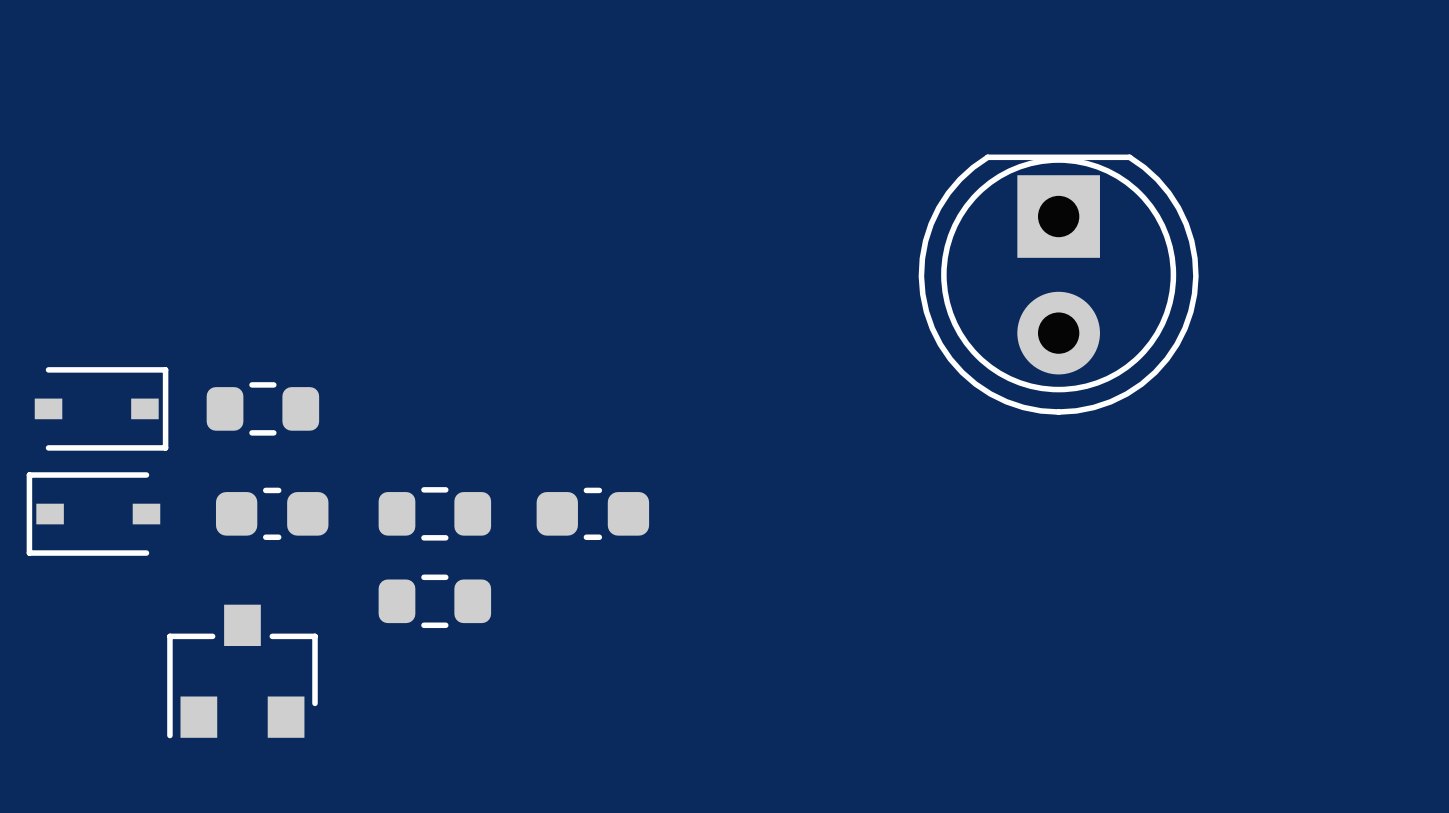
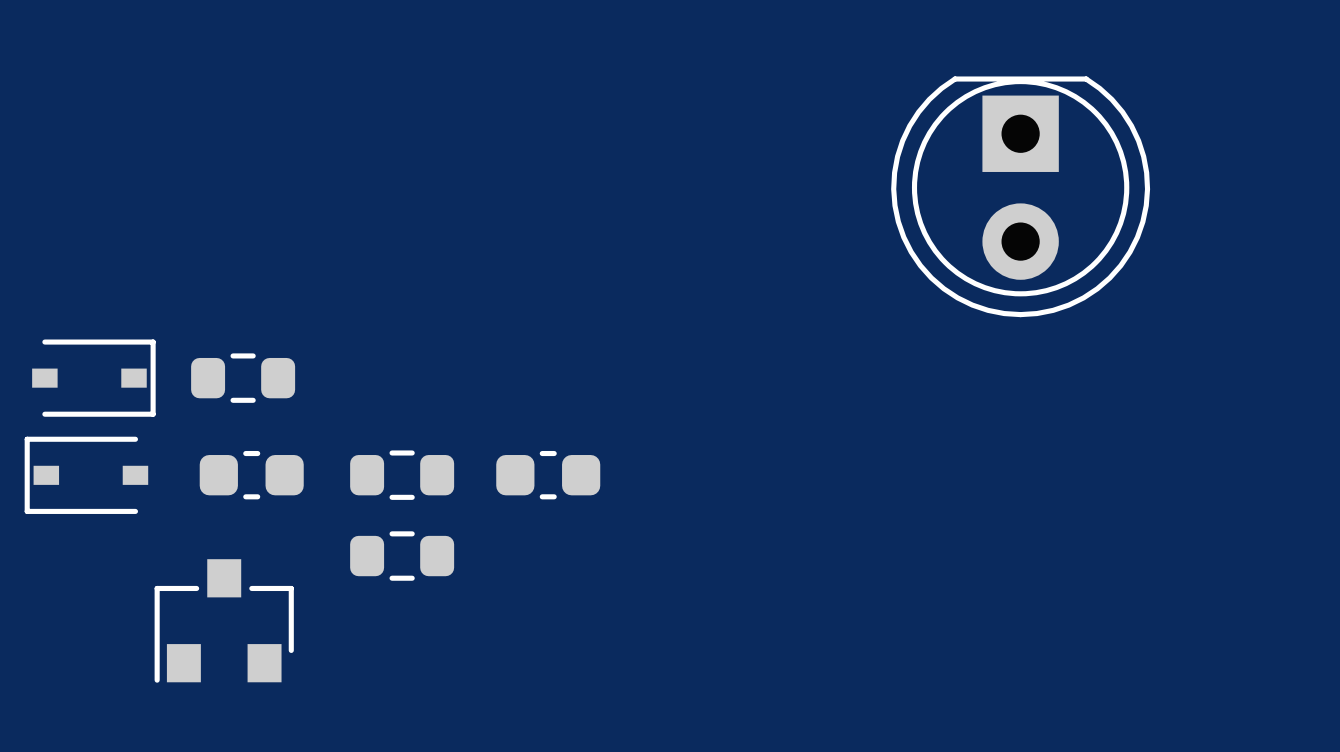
part: none -> (1020, 196)
part: (1058, 284) -> none

